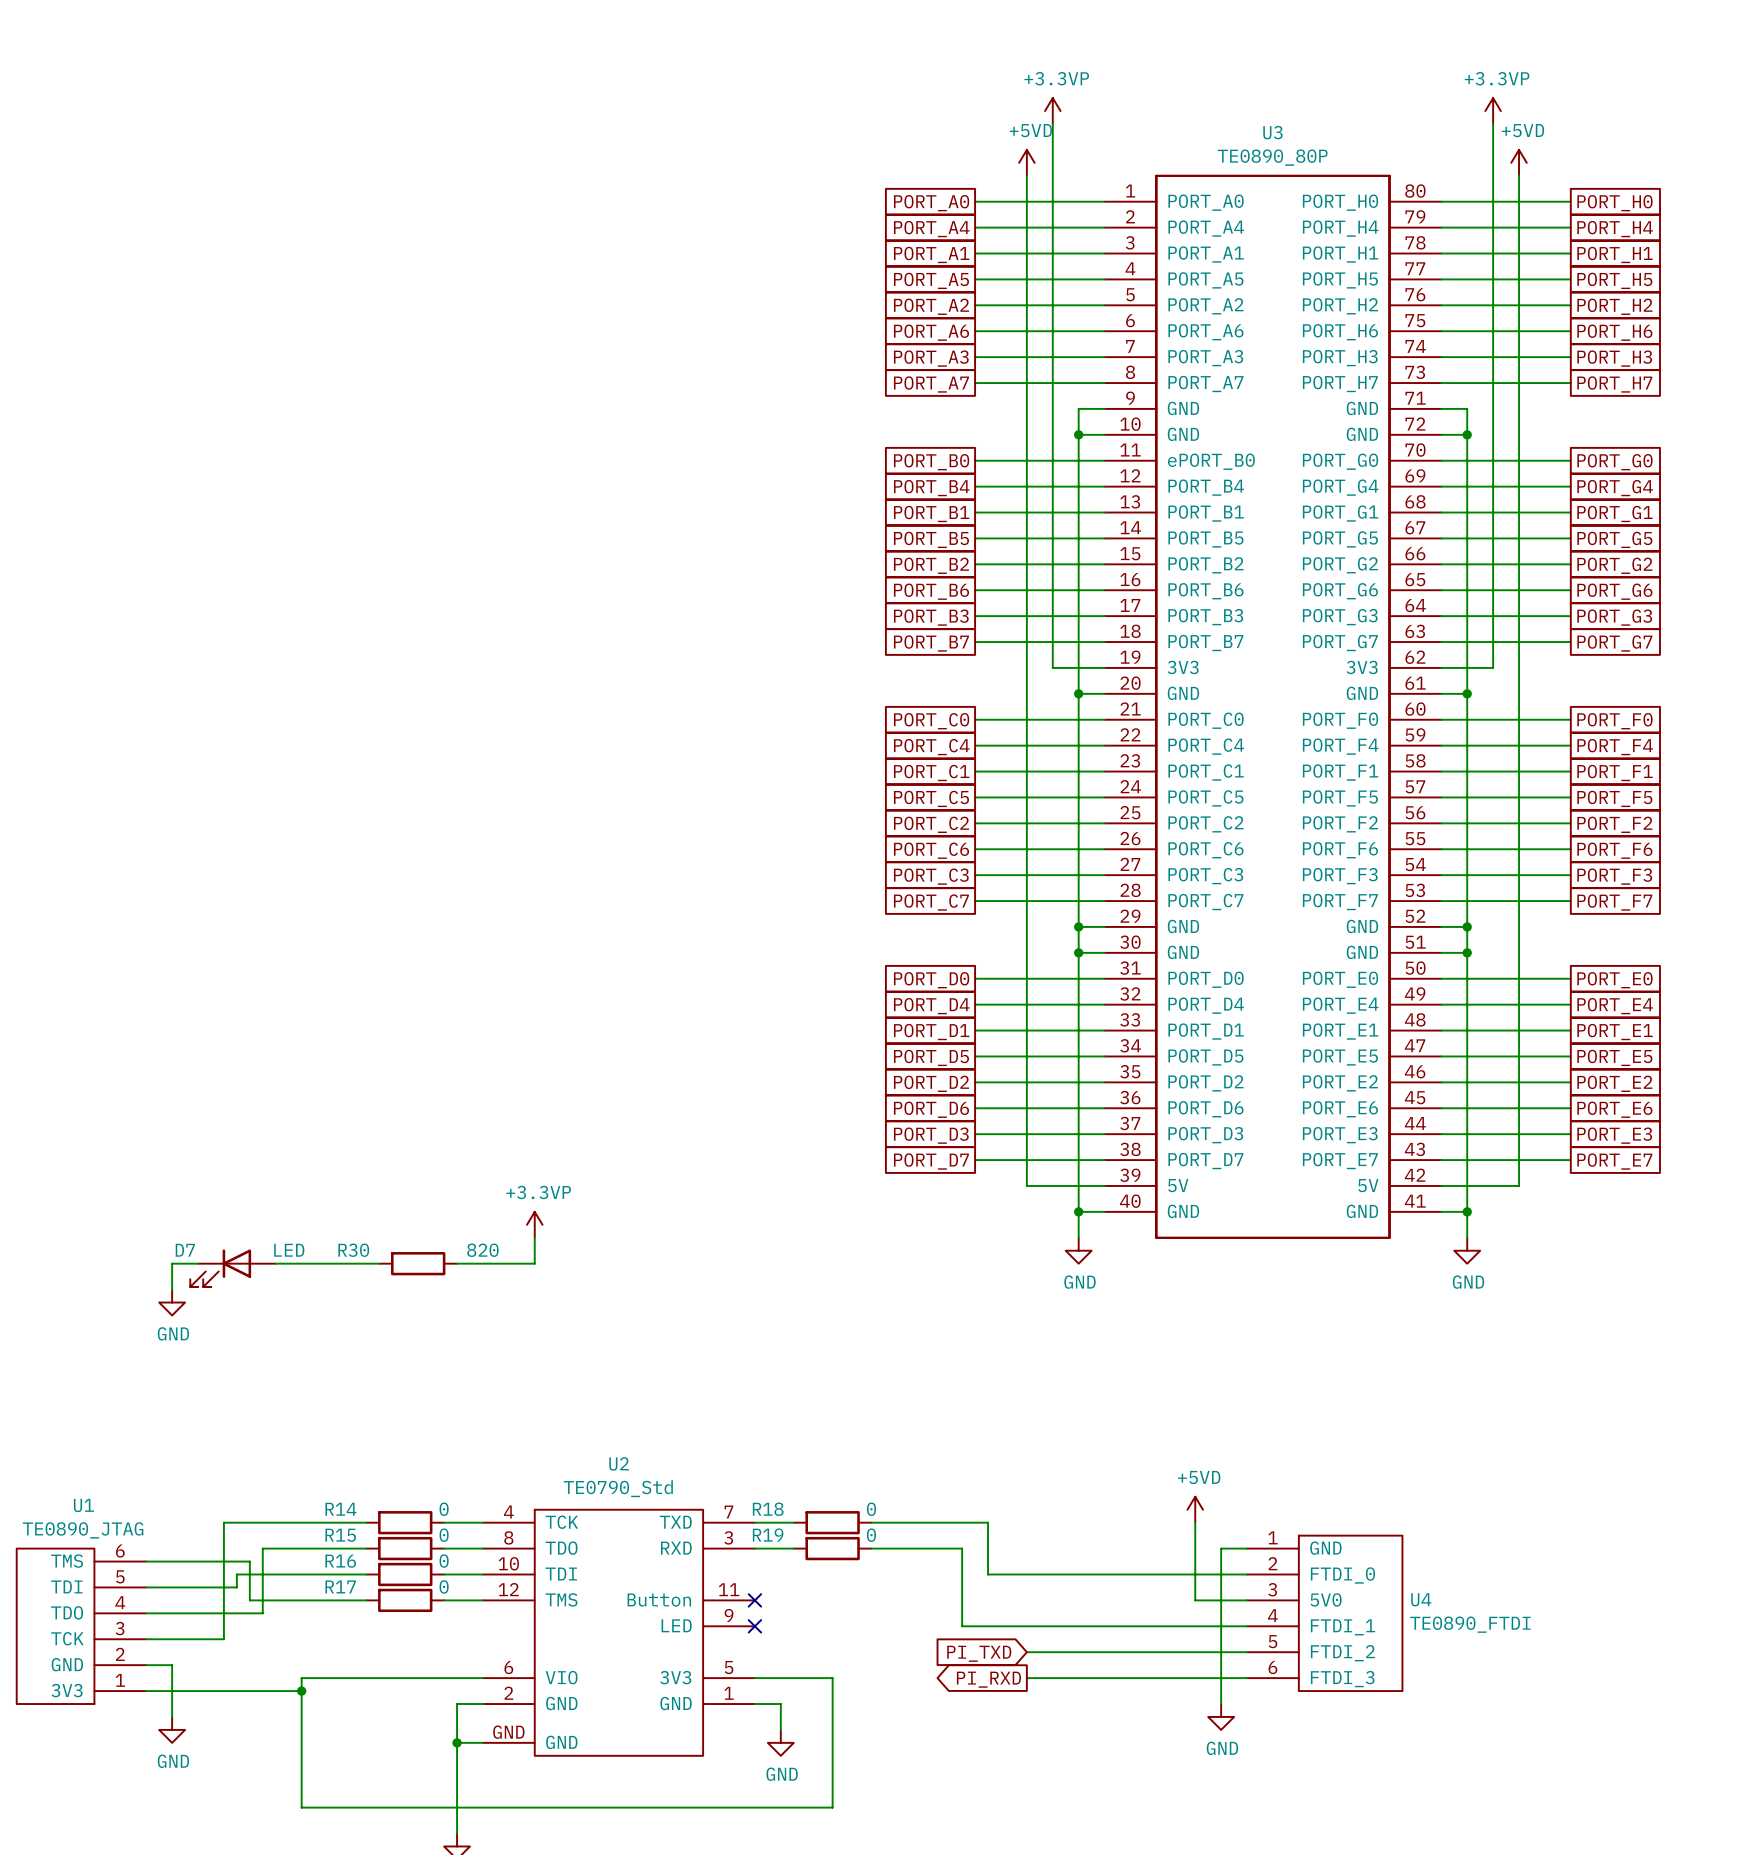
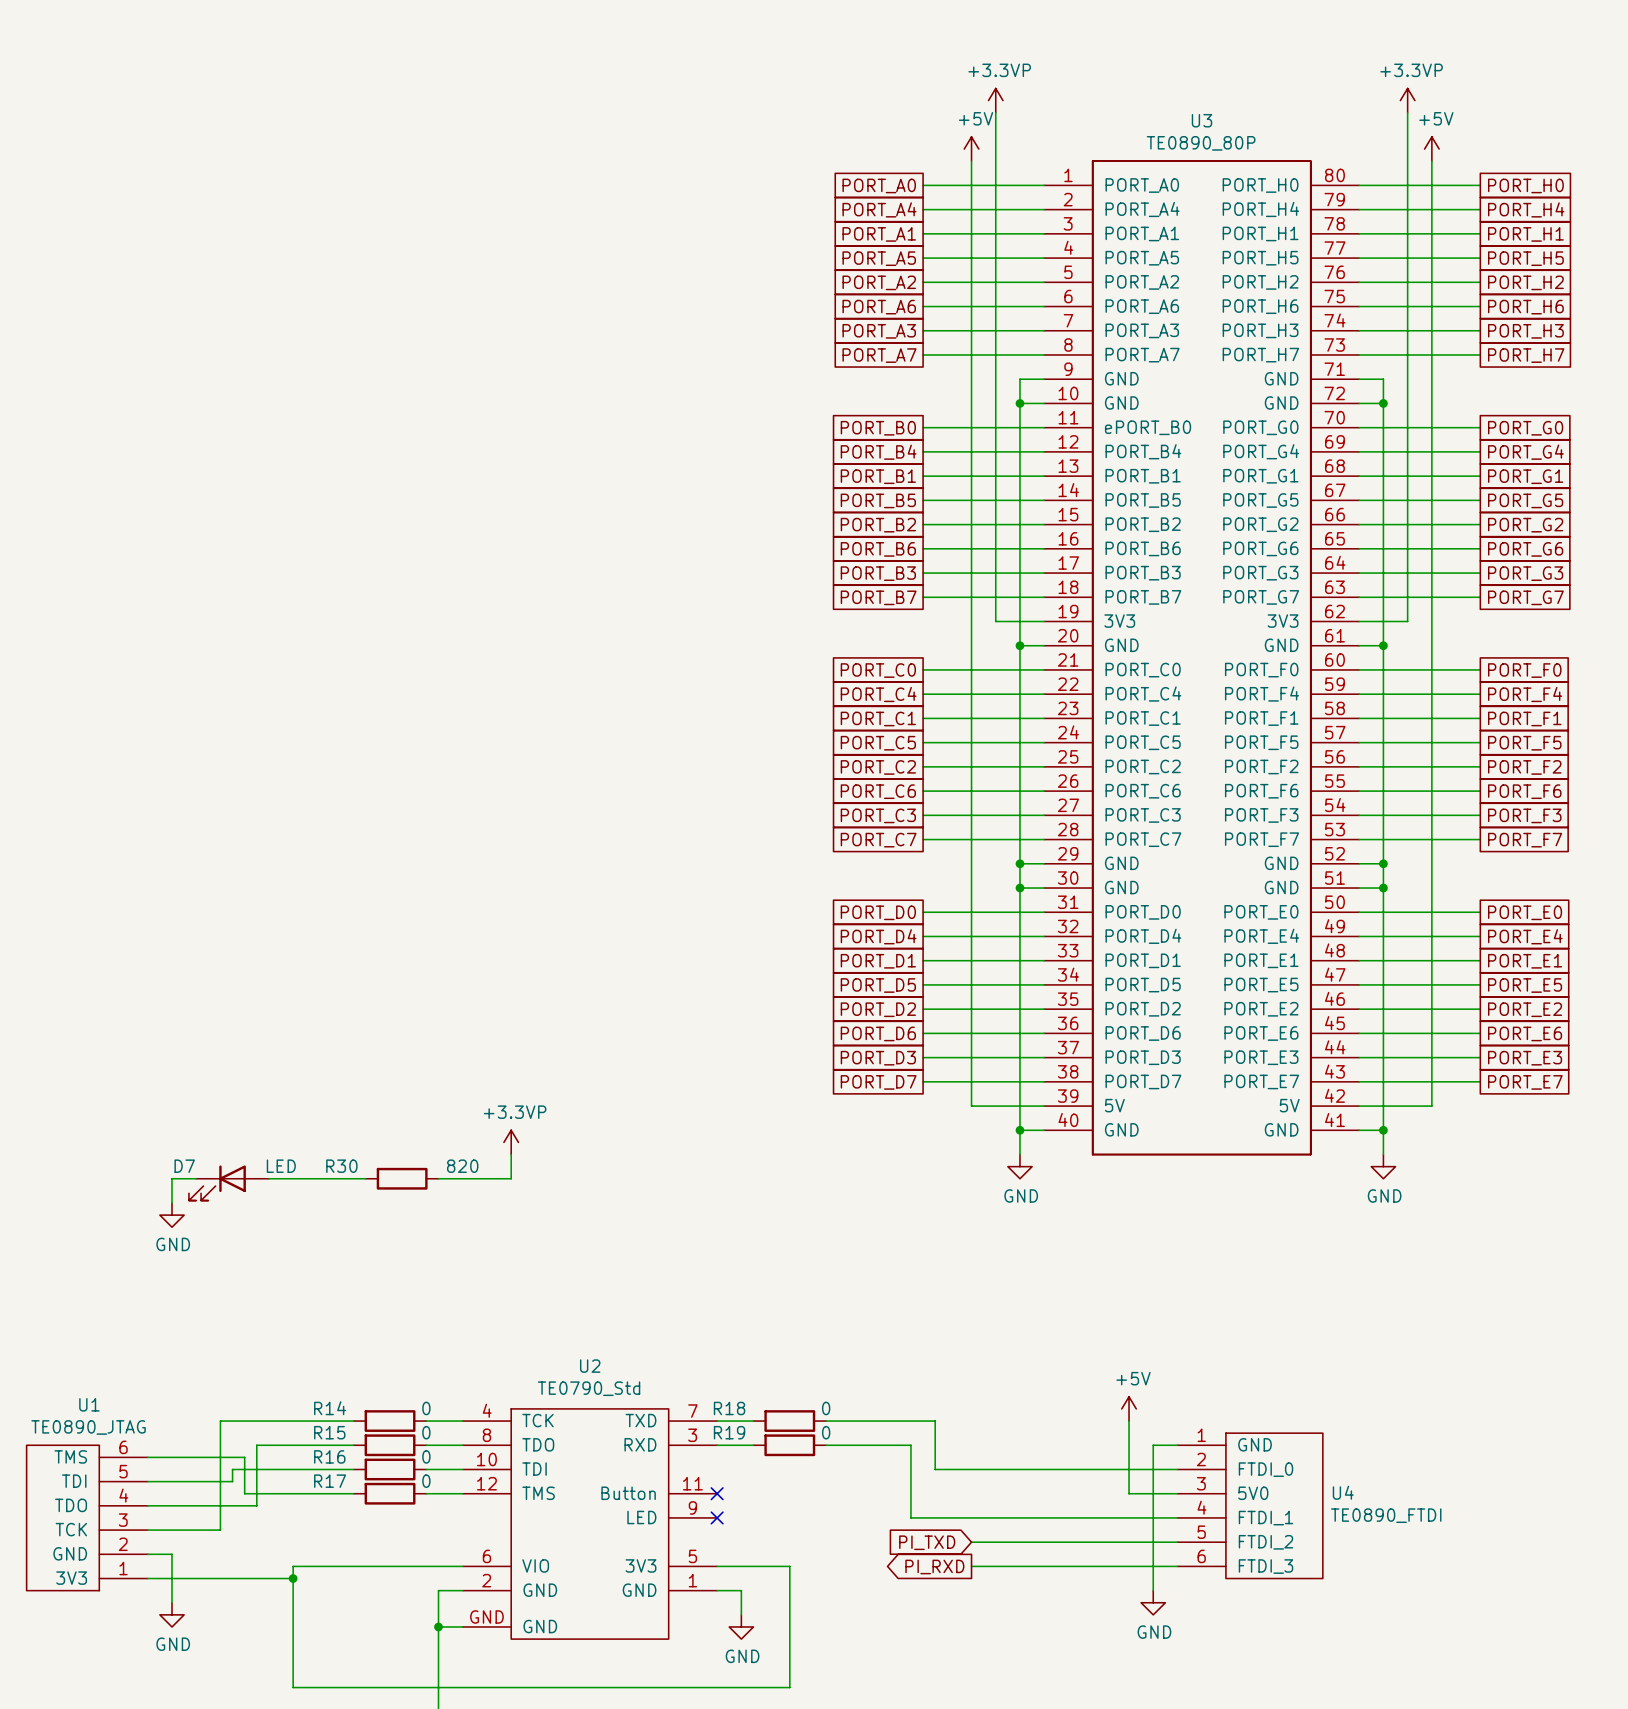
power symbol: +5VD (1026, 162) -> +5V (971, 149)
power symbol: +5VD (1519, 162) -> +5V (1431, 149)
power symbol: +5VD (1195, 1509) -> +5V (1129, 1408)

